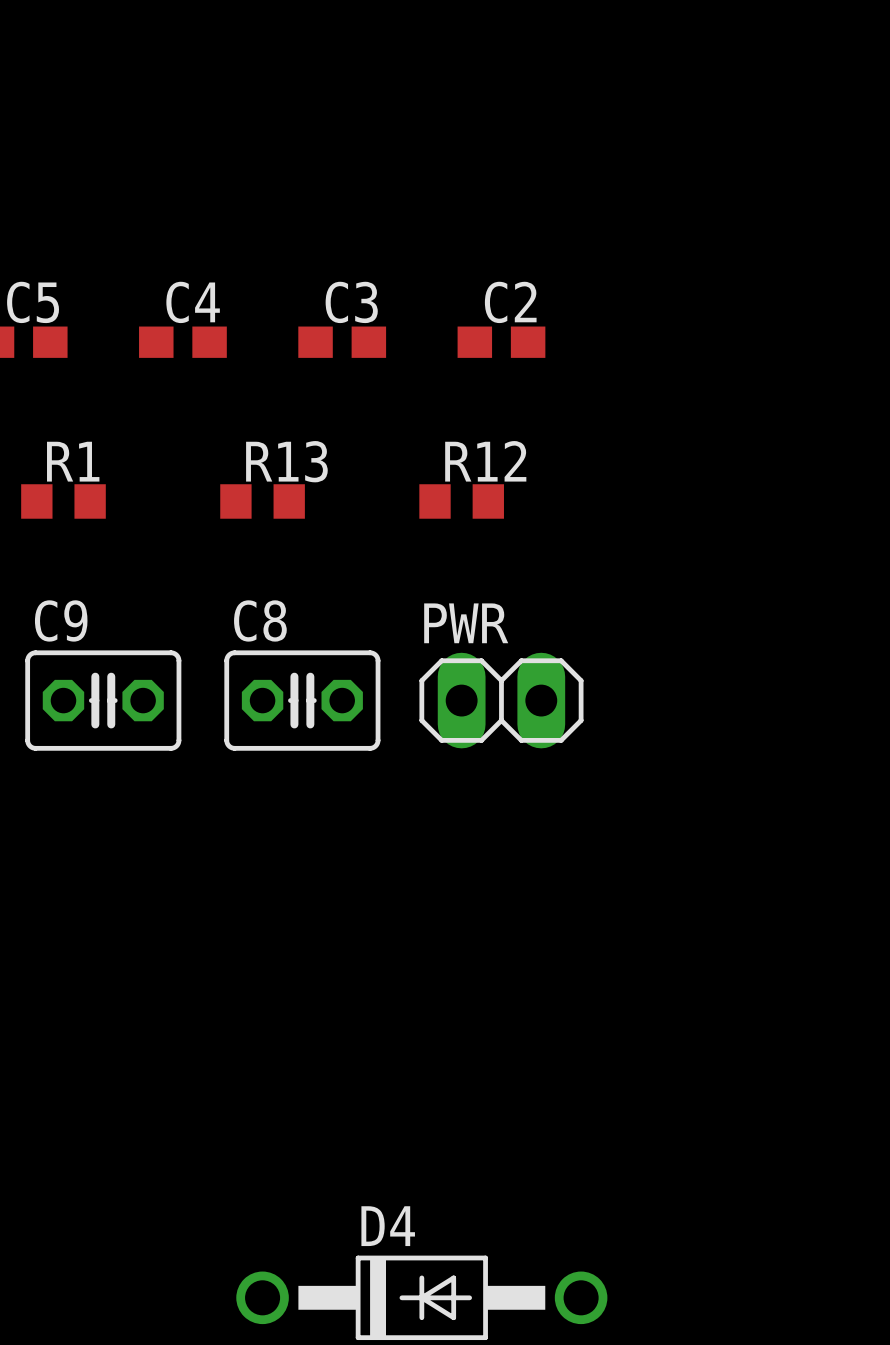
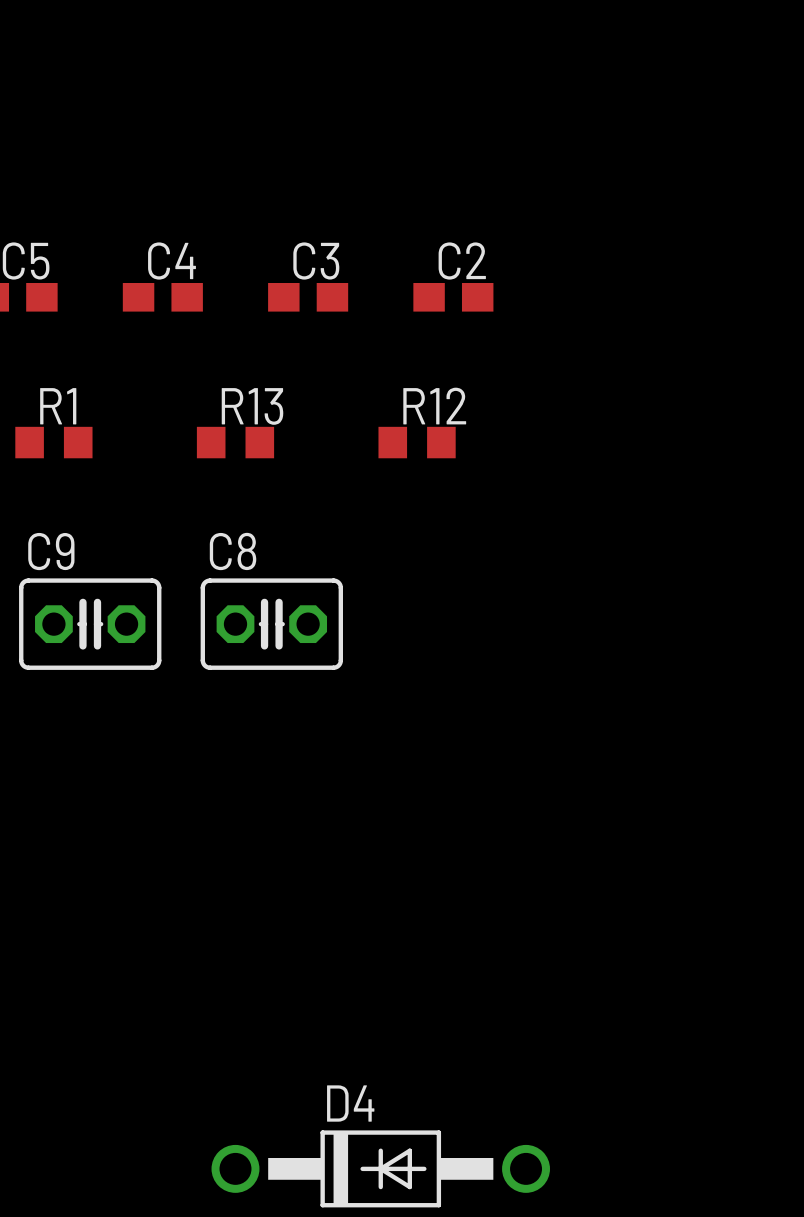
PWR: (501, 700) -> none

